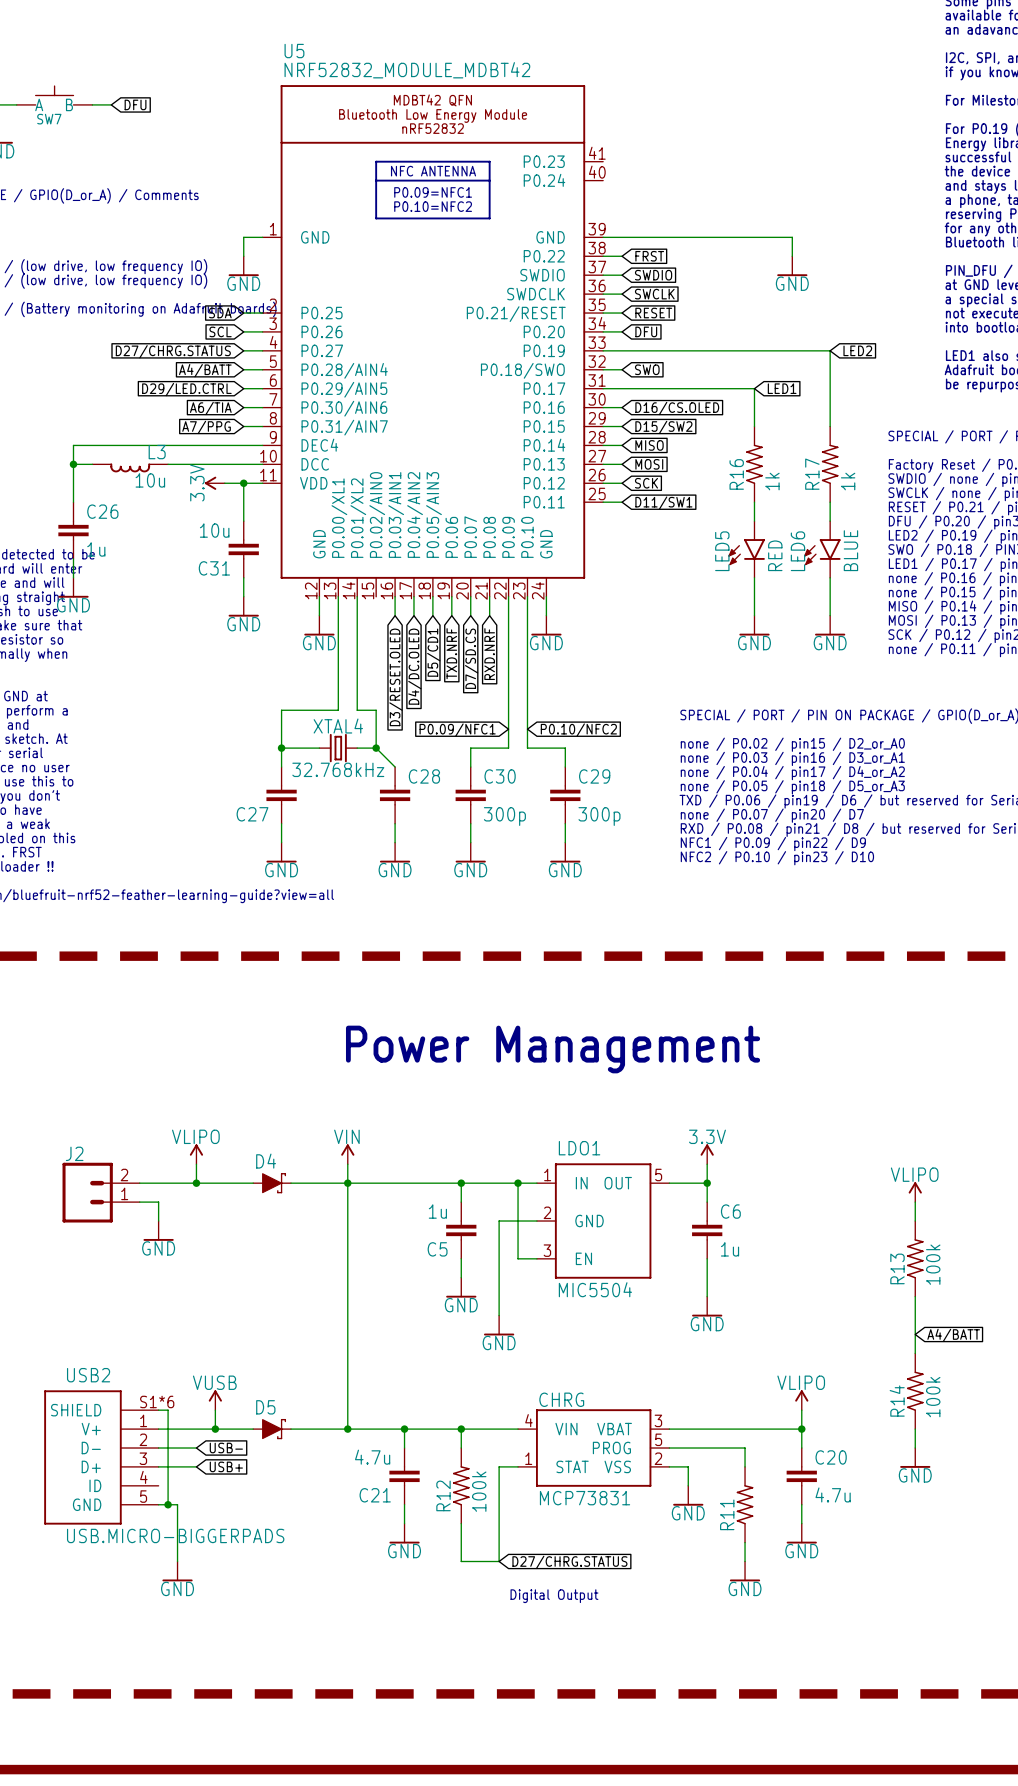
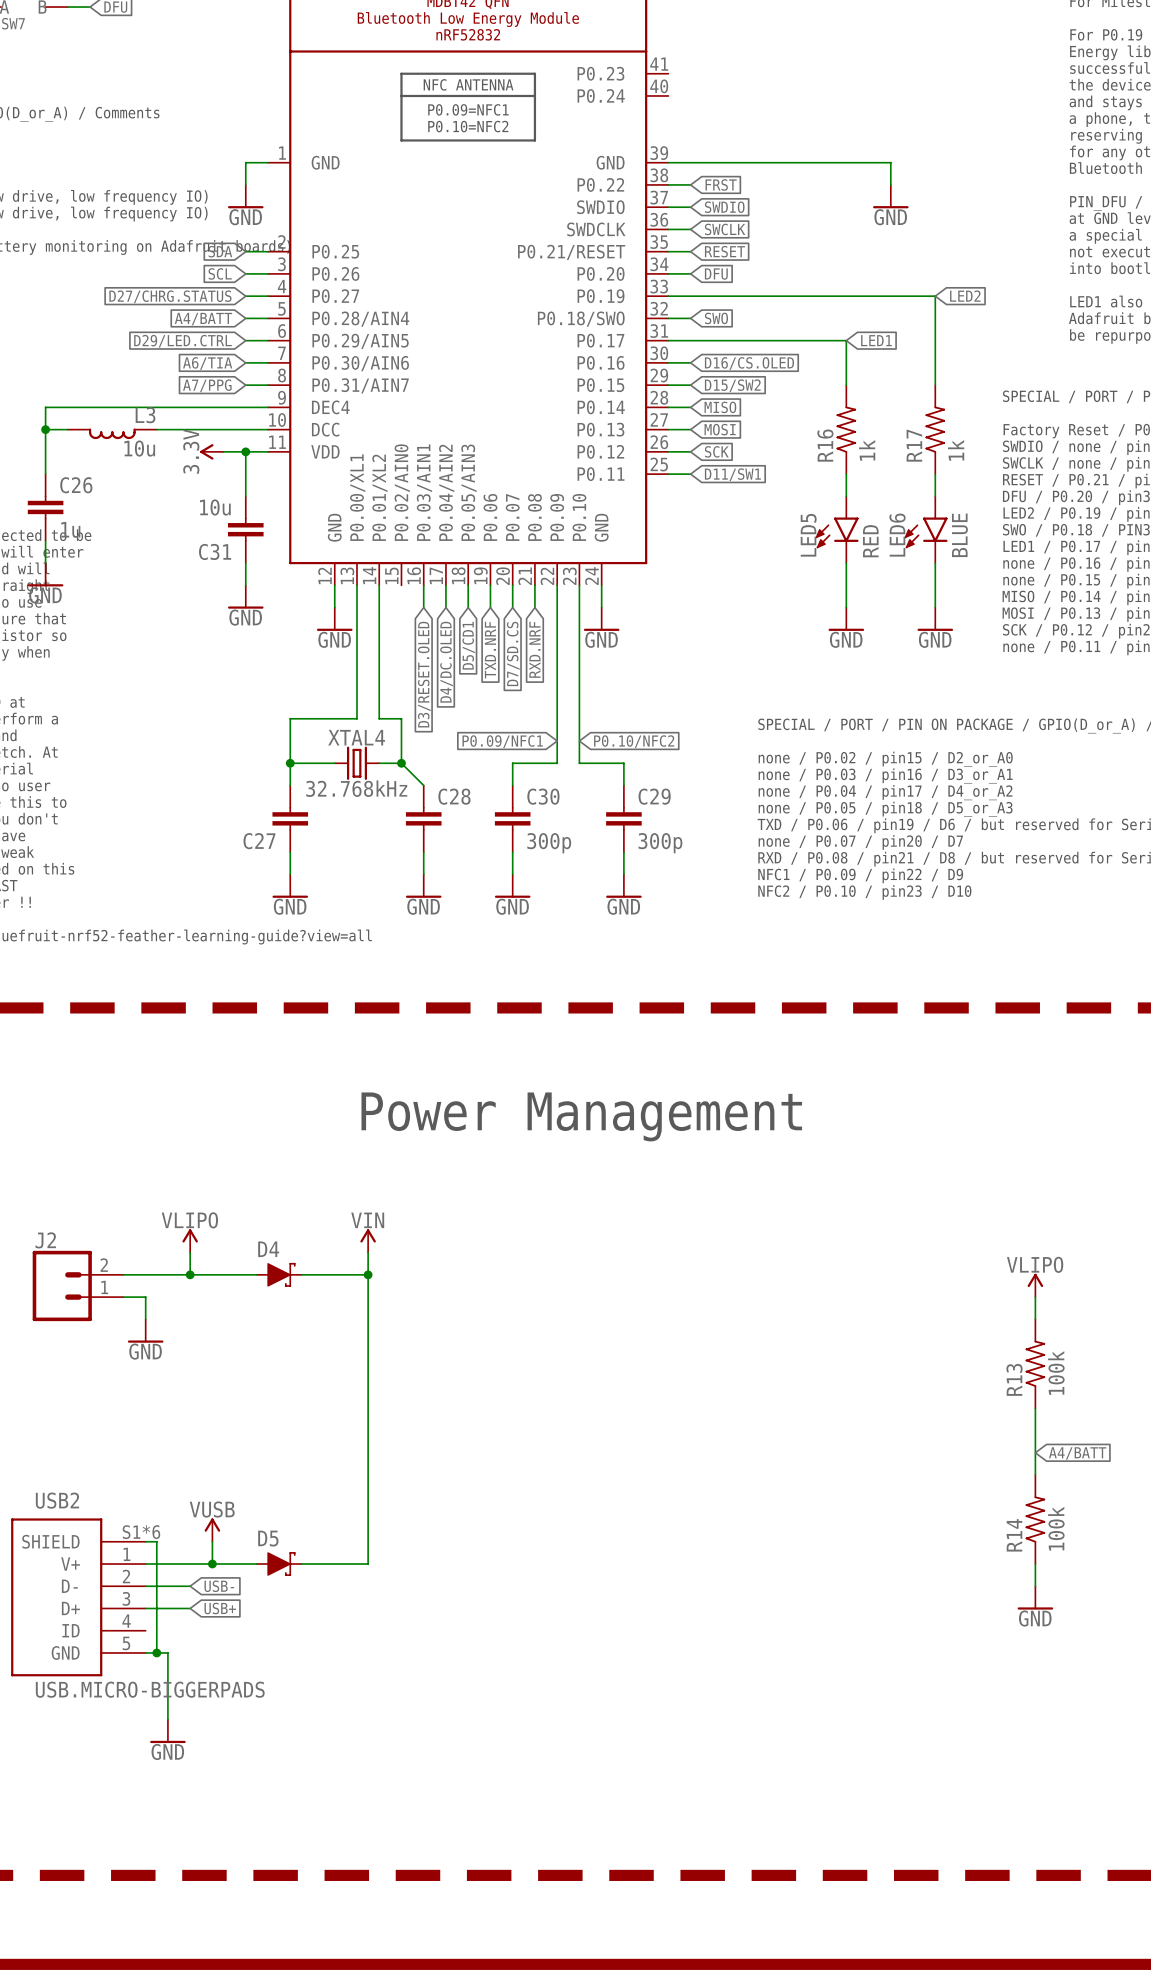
power symbol: 3.3V (707, 1154) -> none
wire: (707, 1164) (707, 1202) -> none
wire: (347, 1183) (536, 1183) -> none
wire: (461, 1183) (461, 1202) -> none
junction: (461, 1183) -> none
wire: (518, 1183) (518, 1258) (536, 1258) -> none
junction: (518, 1183) -> none
wire: (669, 1183) (707, 1183) -> none
junction: (707, 1183) -> none
wire: (536, 1221) (499, 1221) (499, 1315) -> none
LDO1: MIC5504 (603, 1221) -> none
C5: 1u (461, 1230) -> none
C6: 1u (707, 1230) -> none
wire: (461, 1258) (461, 1277) -> none
wire: (707, 1258) (707, 1296) -> none
power symbol: GND (461, 1287) -> none
power symbol: GND (707, 1306) -> none
power symbol: GND (499, 1325) -> none
power symbol: VLIPO (801, 1400) -> none
wire: (801, 1410) (801, 1448) -> none
wire: (347, 1429) (518, 1429) -> none
junction: (347, 1429) -> none
wire: (404, 1429) (404, 1448) -> none
junction: (404, 1429) -> none
wire: (461, 1429) (461, 1448) -> none
junction: (461, 1429) -> none
wire: (669, 1429) (801, 1429) -> none
junction: (801, 1429) -> none
CHRG: MCP73831 (593, 1448) -> none
wire: (669, 1448) (745, 1448) (745, 1466) -> none
wire: (518, 1466) (499, 1466) (499, 1561) (461, 1561) (461, 1523) -> none
wire: (669, 1466) (688, 1466) (688, 1485) -> none
C21: 4.7u (404, 1476) -> none
C20: 4.7u (801, 1476) -> none
R12: 100k (461, 1485) -> none
power symbol: GND (688, 1495) -> none
wire: (404, 1504) (404, 1523) -> none
R11: (745, 1504) -> none
wire: (801, 1504) (801, 1523) -> none
power symbol: GND (404, 1533) -> none
power symbol: GND (801, 1533) -> none
wire: (745, 1542) (745, 1561) -> none
global label: D27/CHRG.STATUS (569, 1562) -> none
power symbol: GND (745, 1571) -> none
text: Digital Output (554, 1596) -> none

